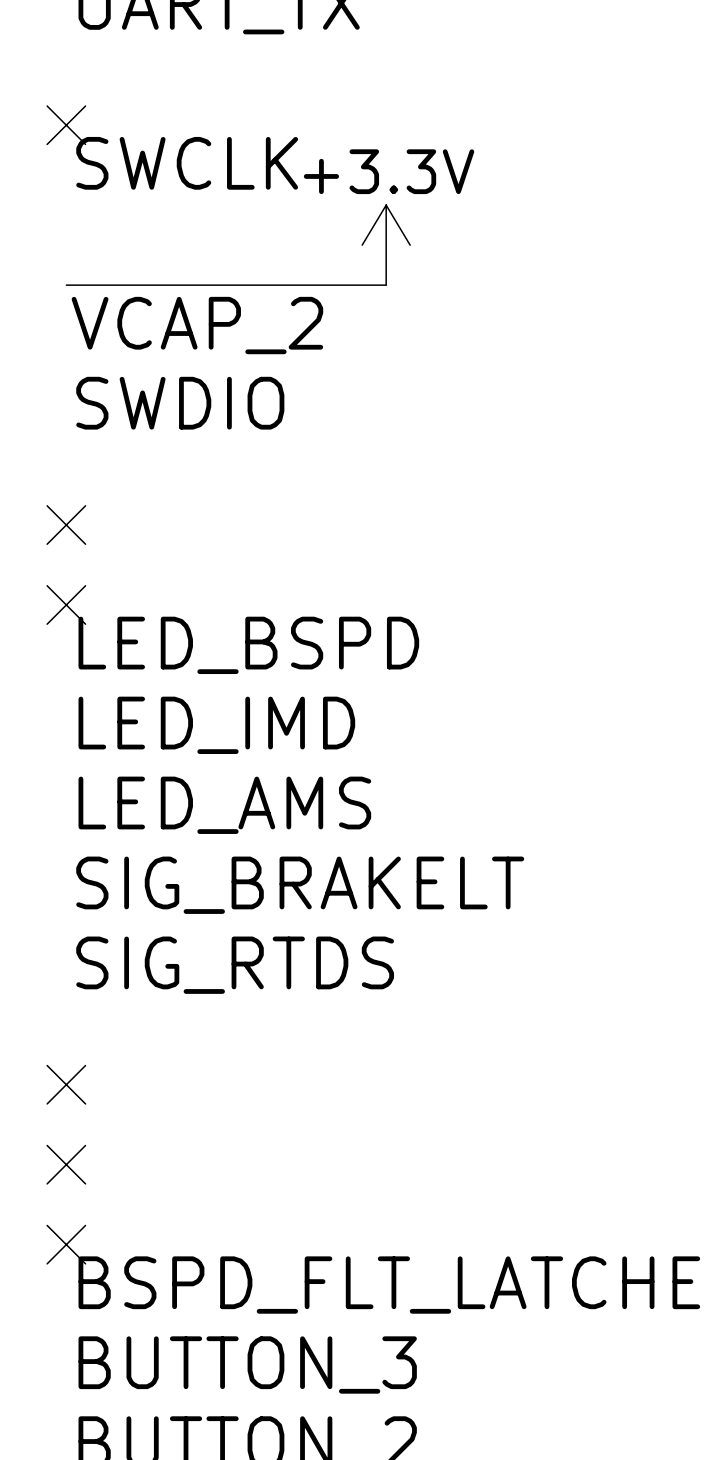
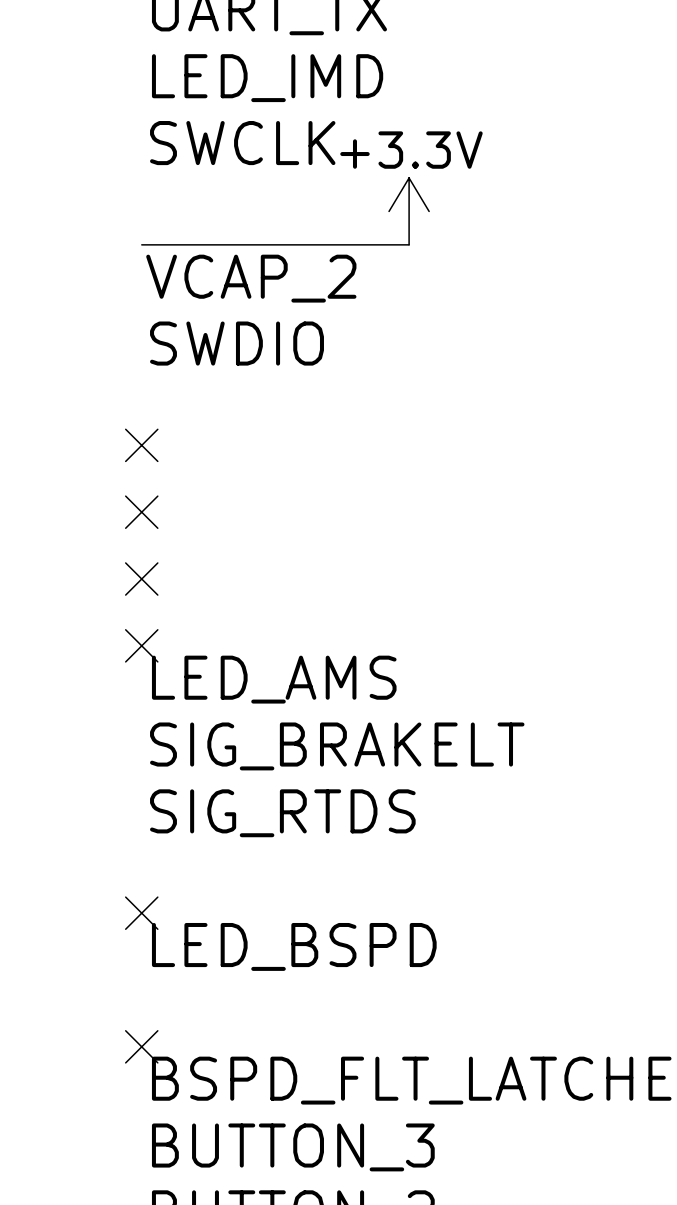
no-connect mark: (66, 125) -> none
label position: LED_BSPD (248, 645) -> LED_BSPD (294, 946)
no-connect mark: none -> (141, 579)
label position: LED_IMD (216, 725) -> LED_IMD (267, 78)
no-connect mark: none -> (141, 645)
no-connect mark: (66, 1164) -> none

